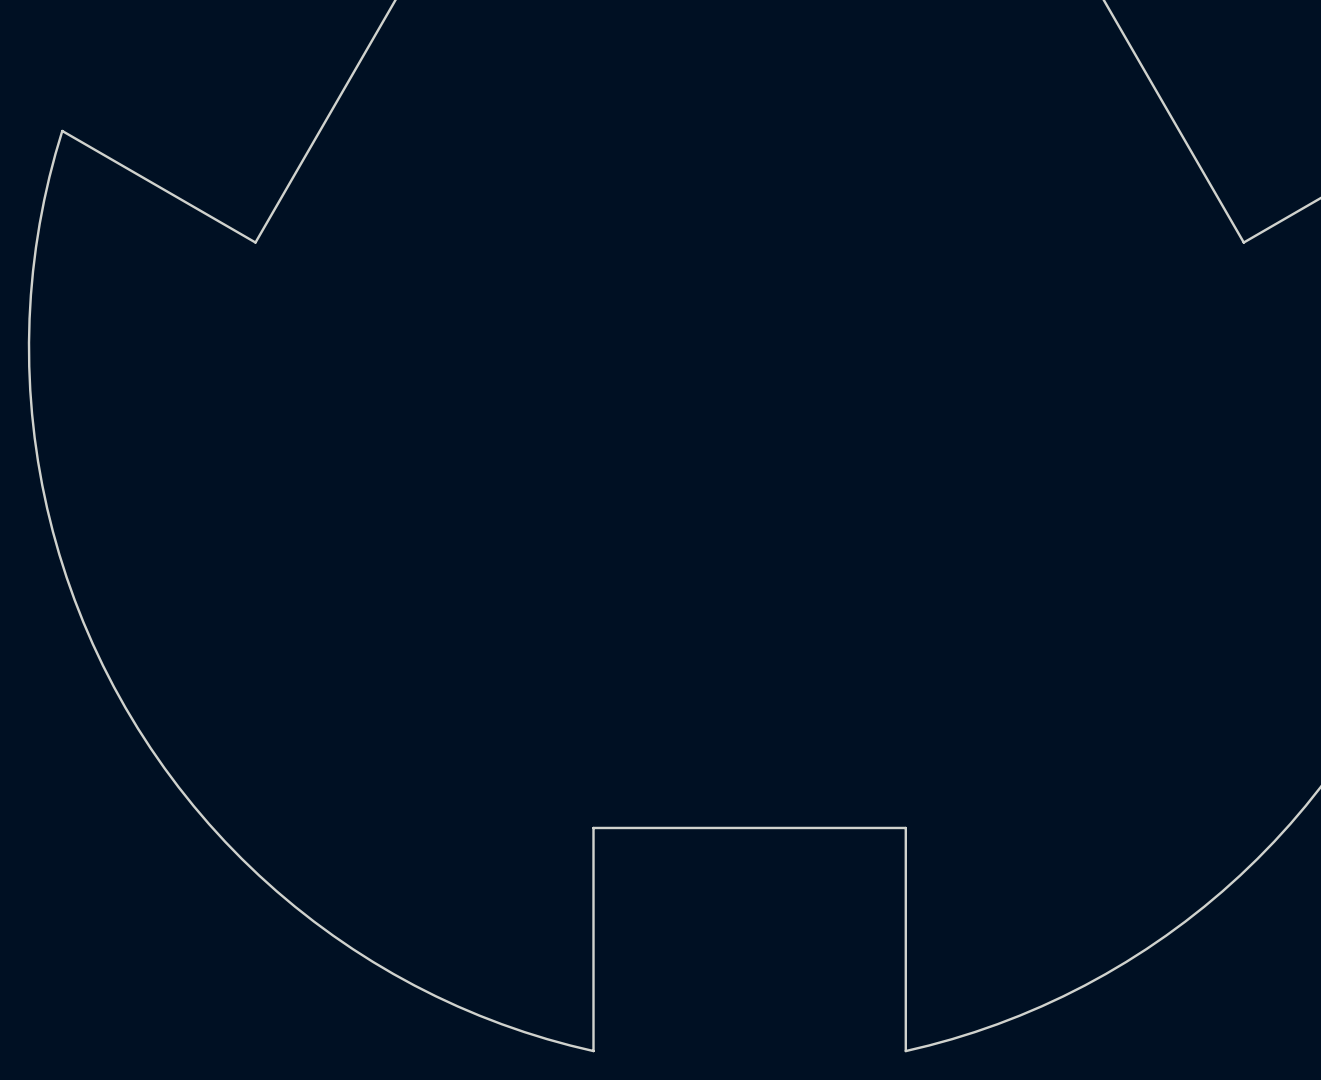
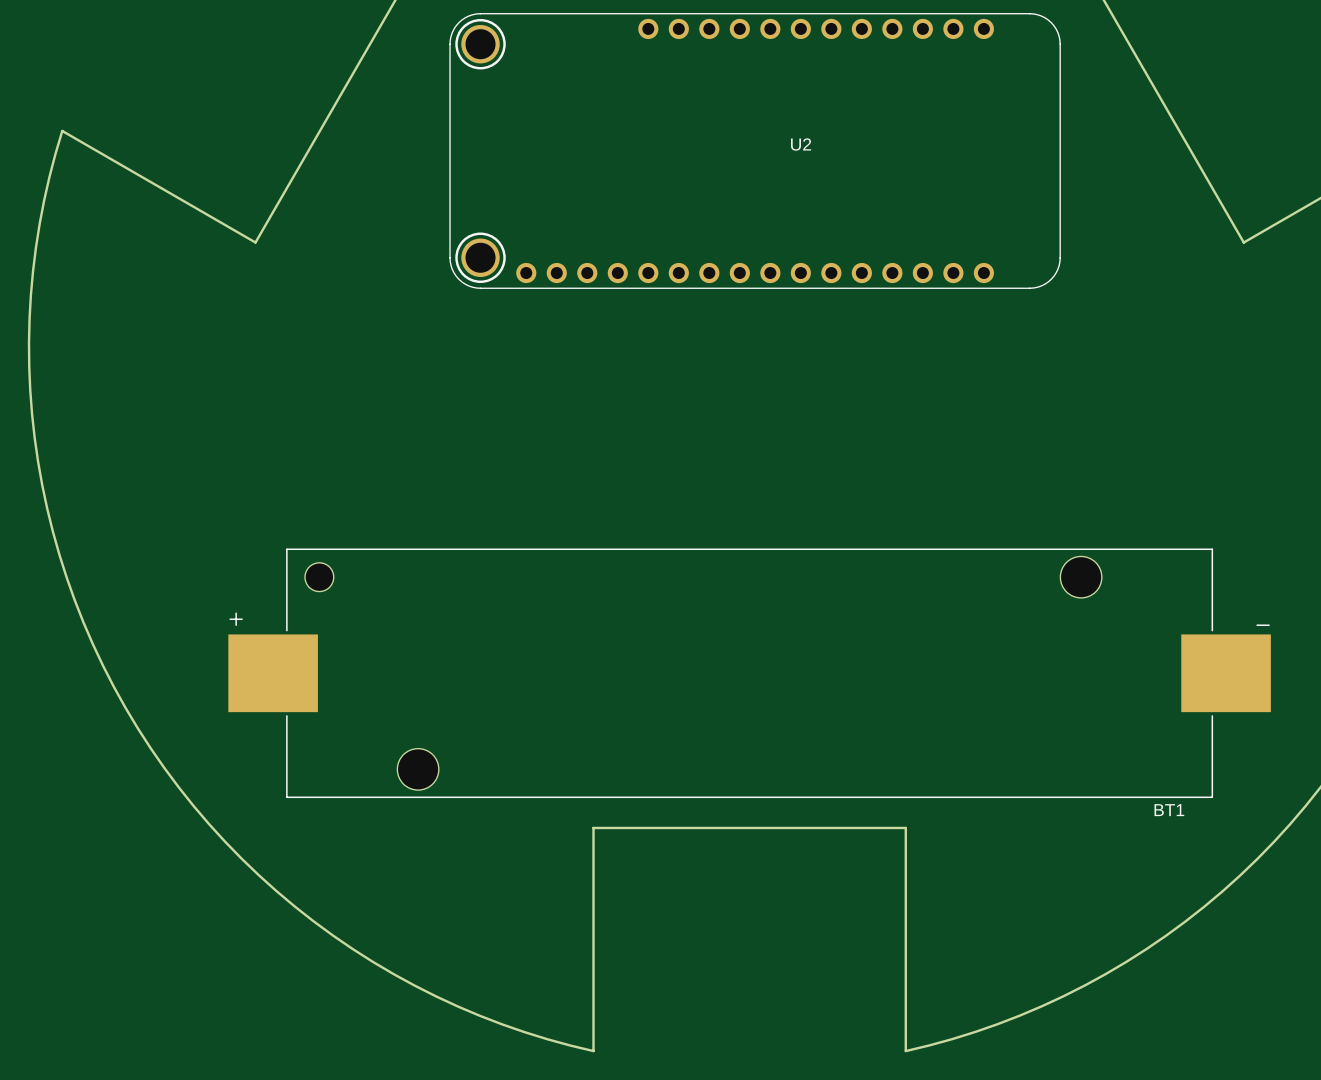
U2: none -> (755, 150)
BT1: none -> (749, 673)

